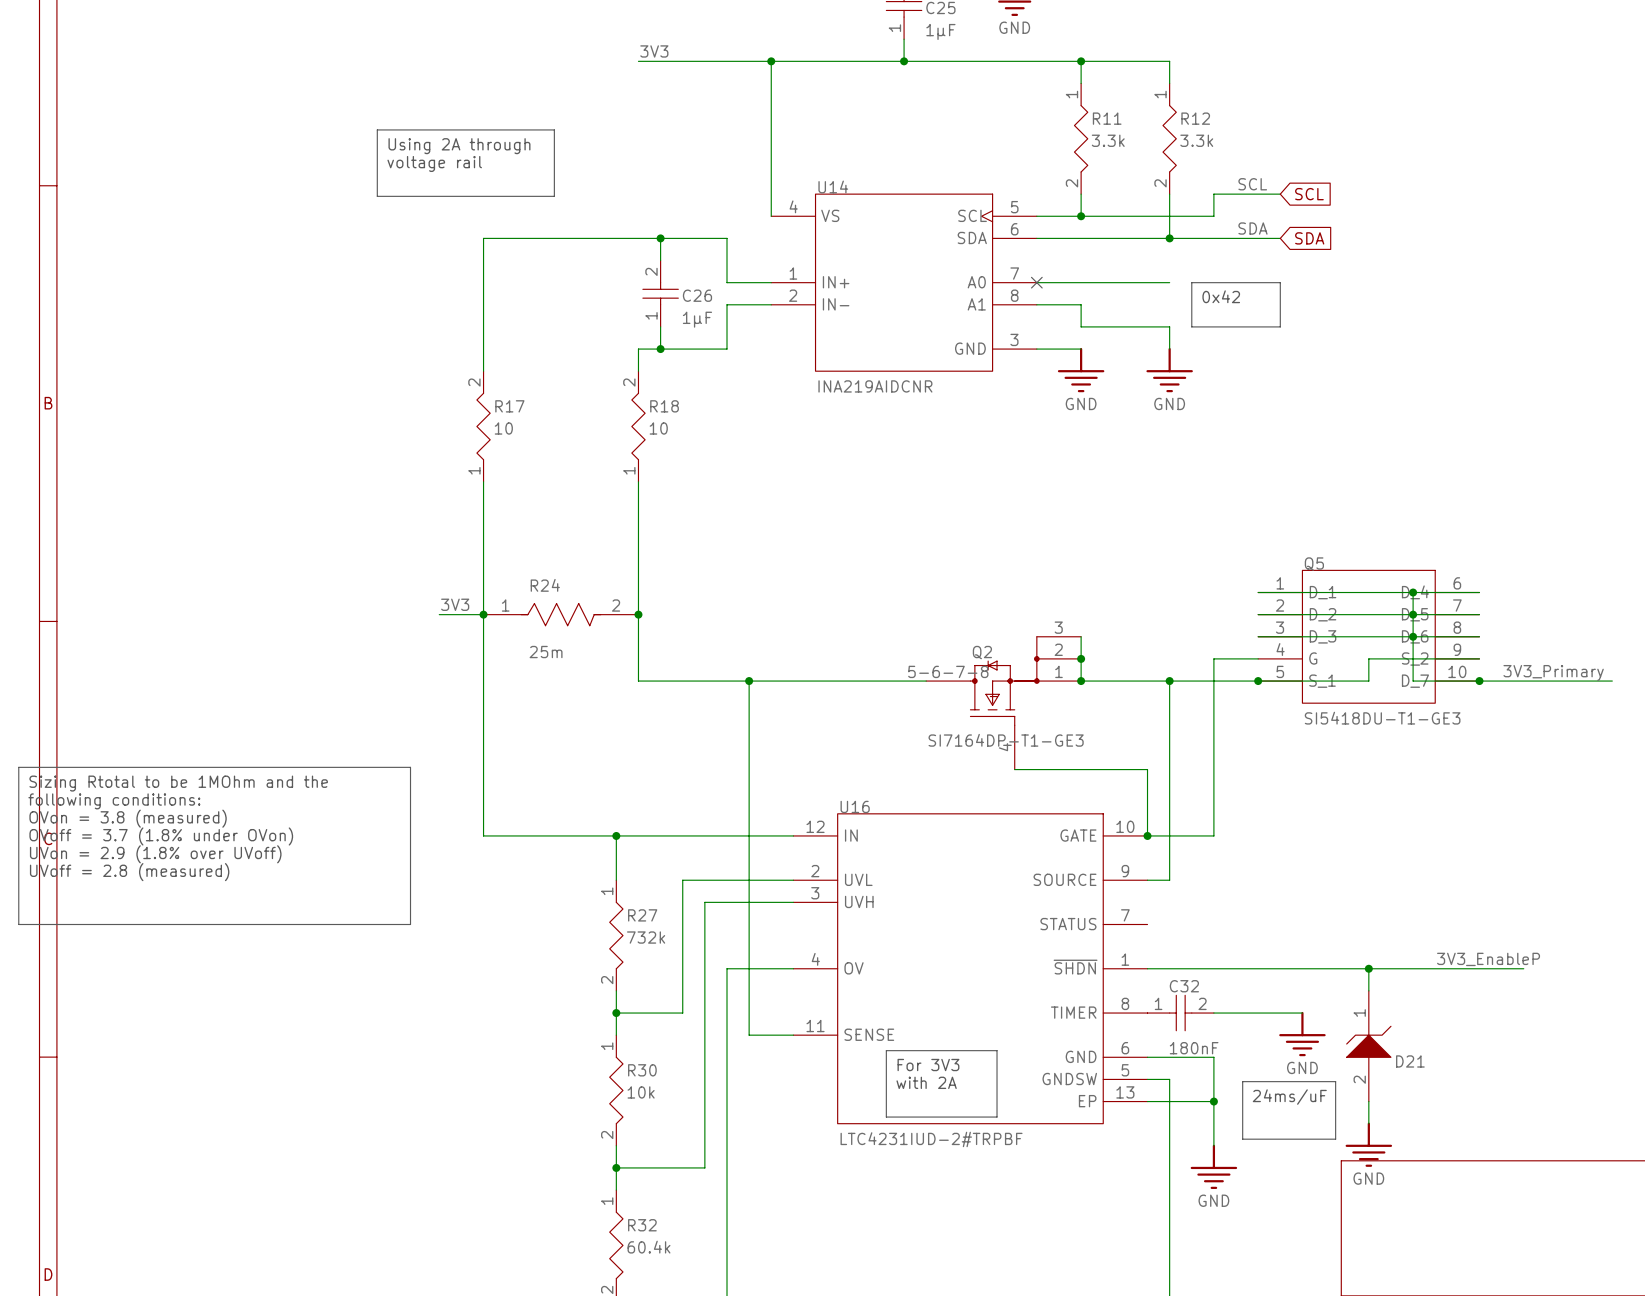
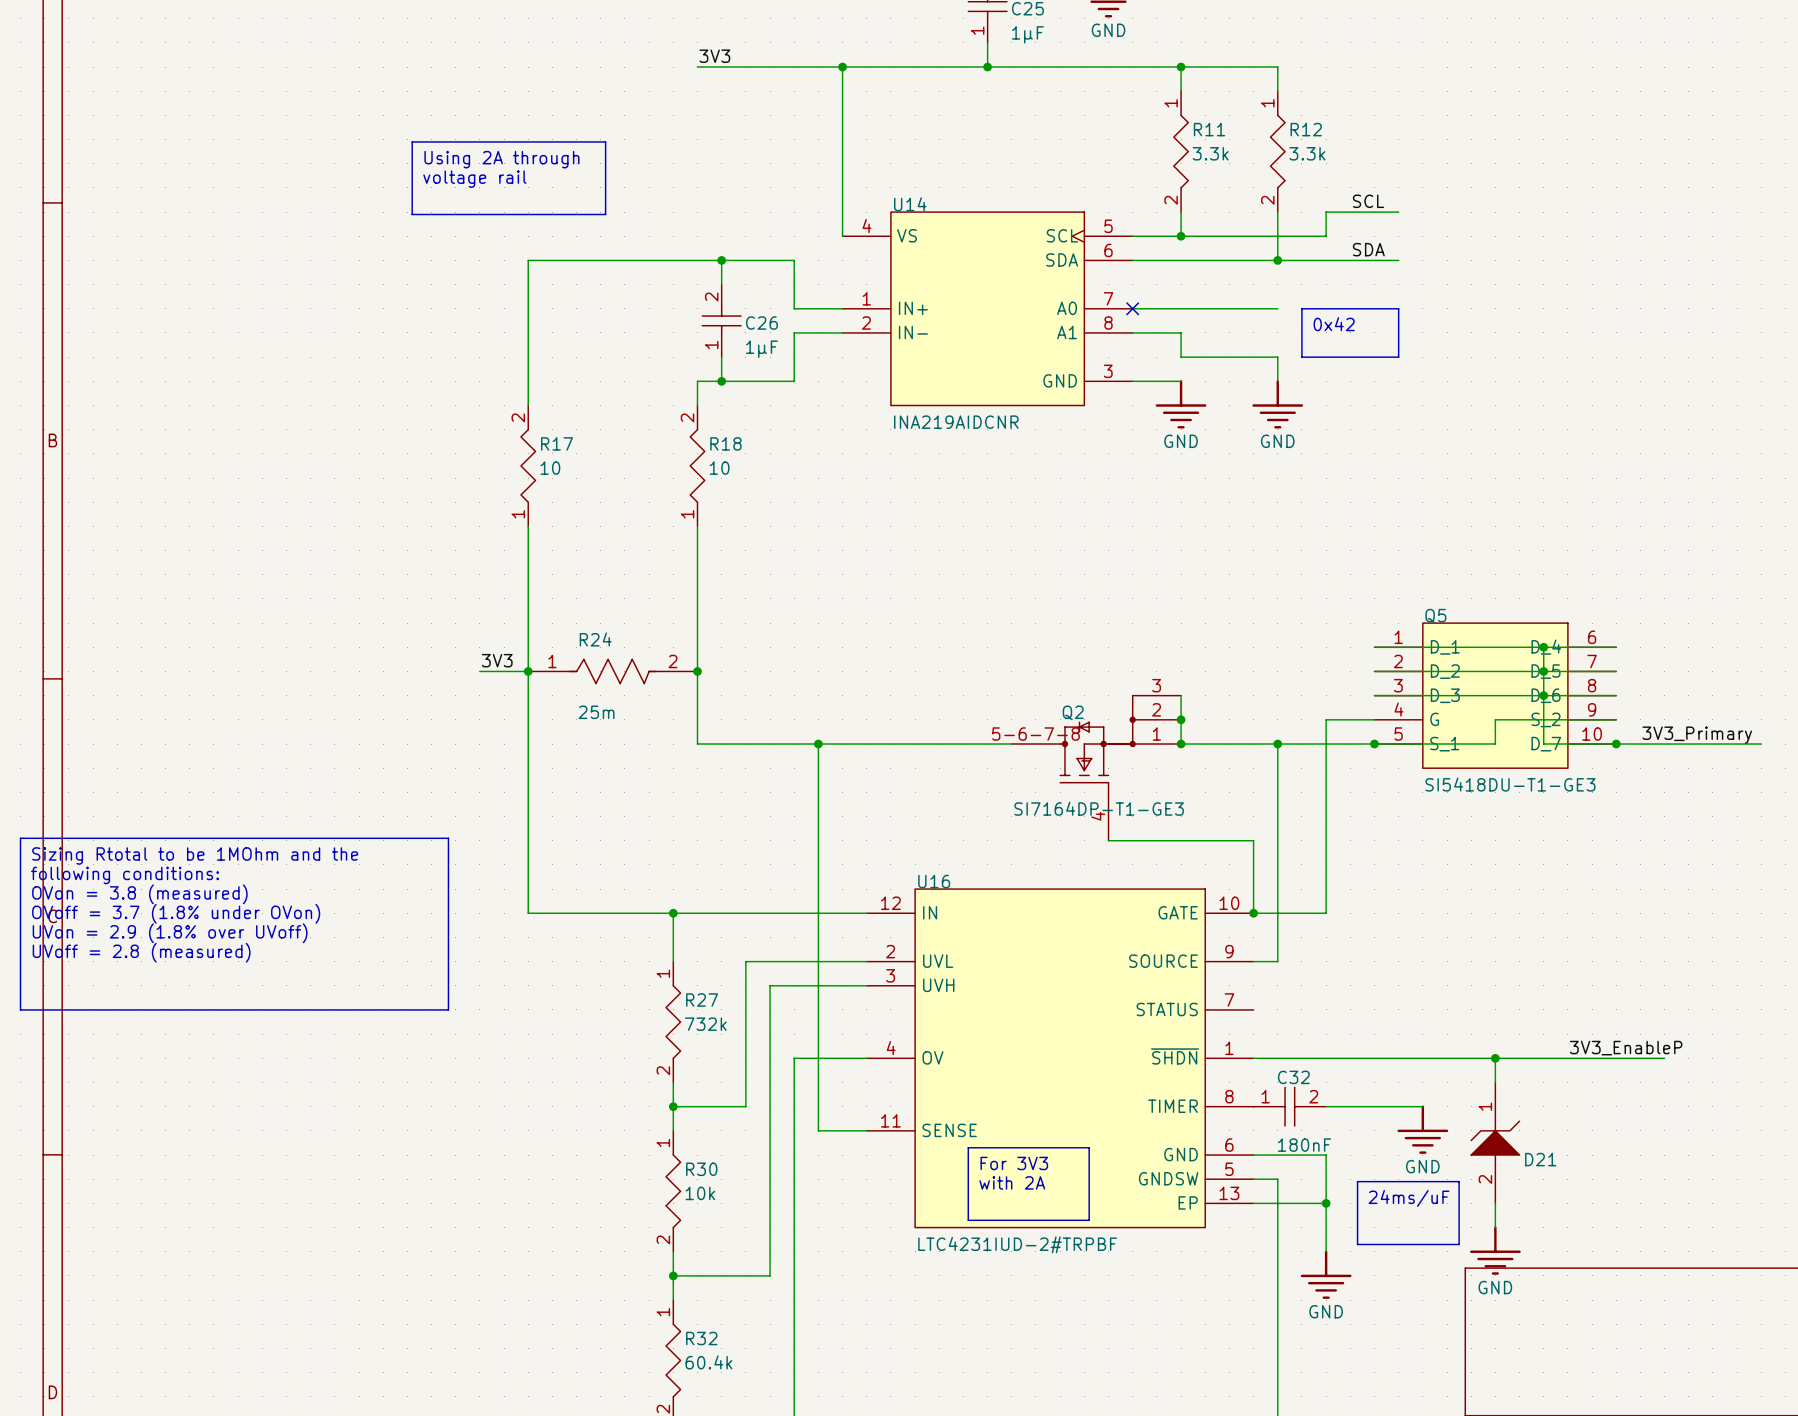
global label: SCL (1309, 194) -> none
global label: SDA (1309, 238) -> none

